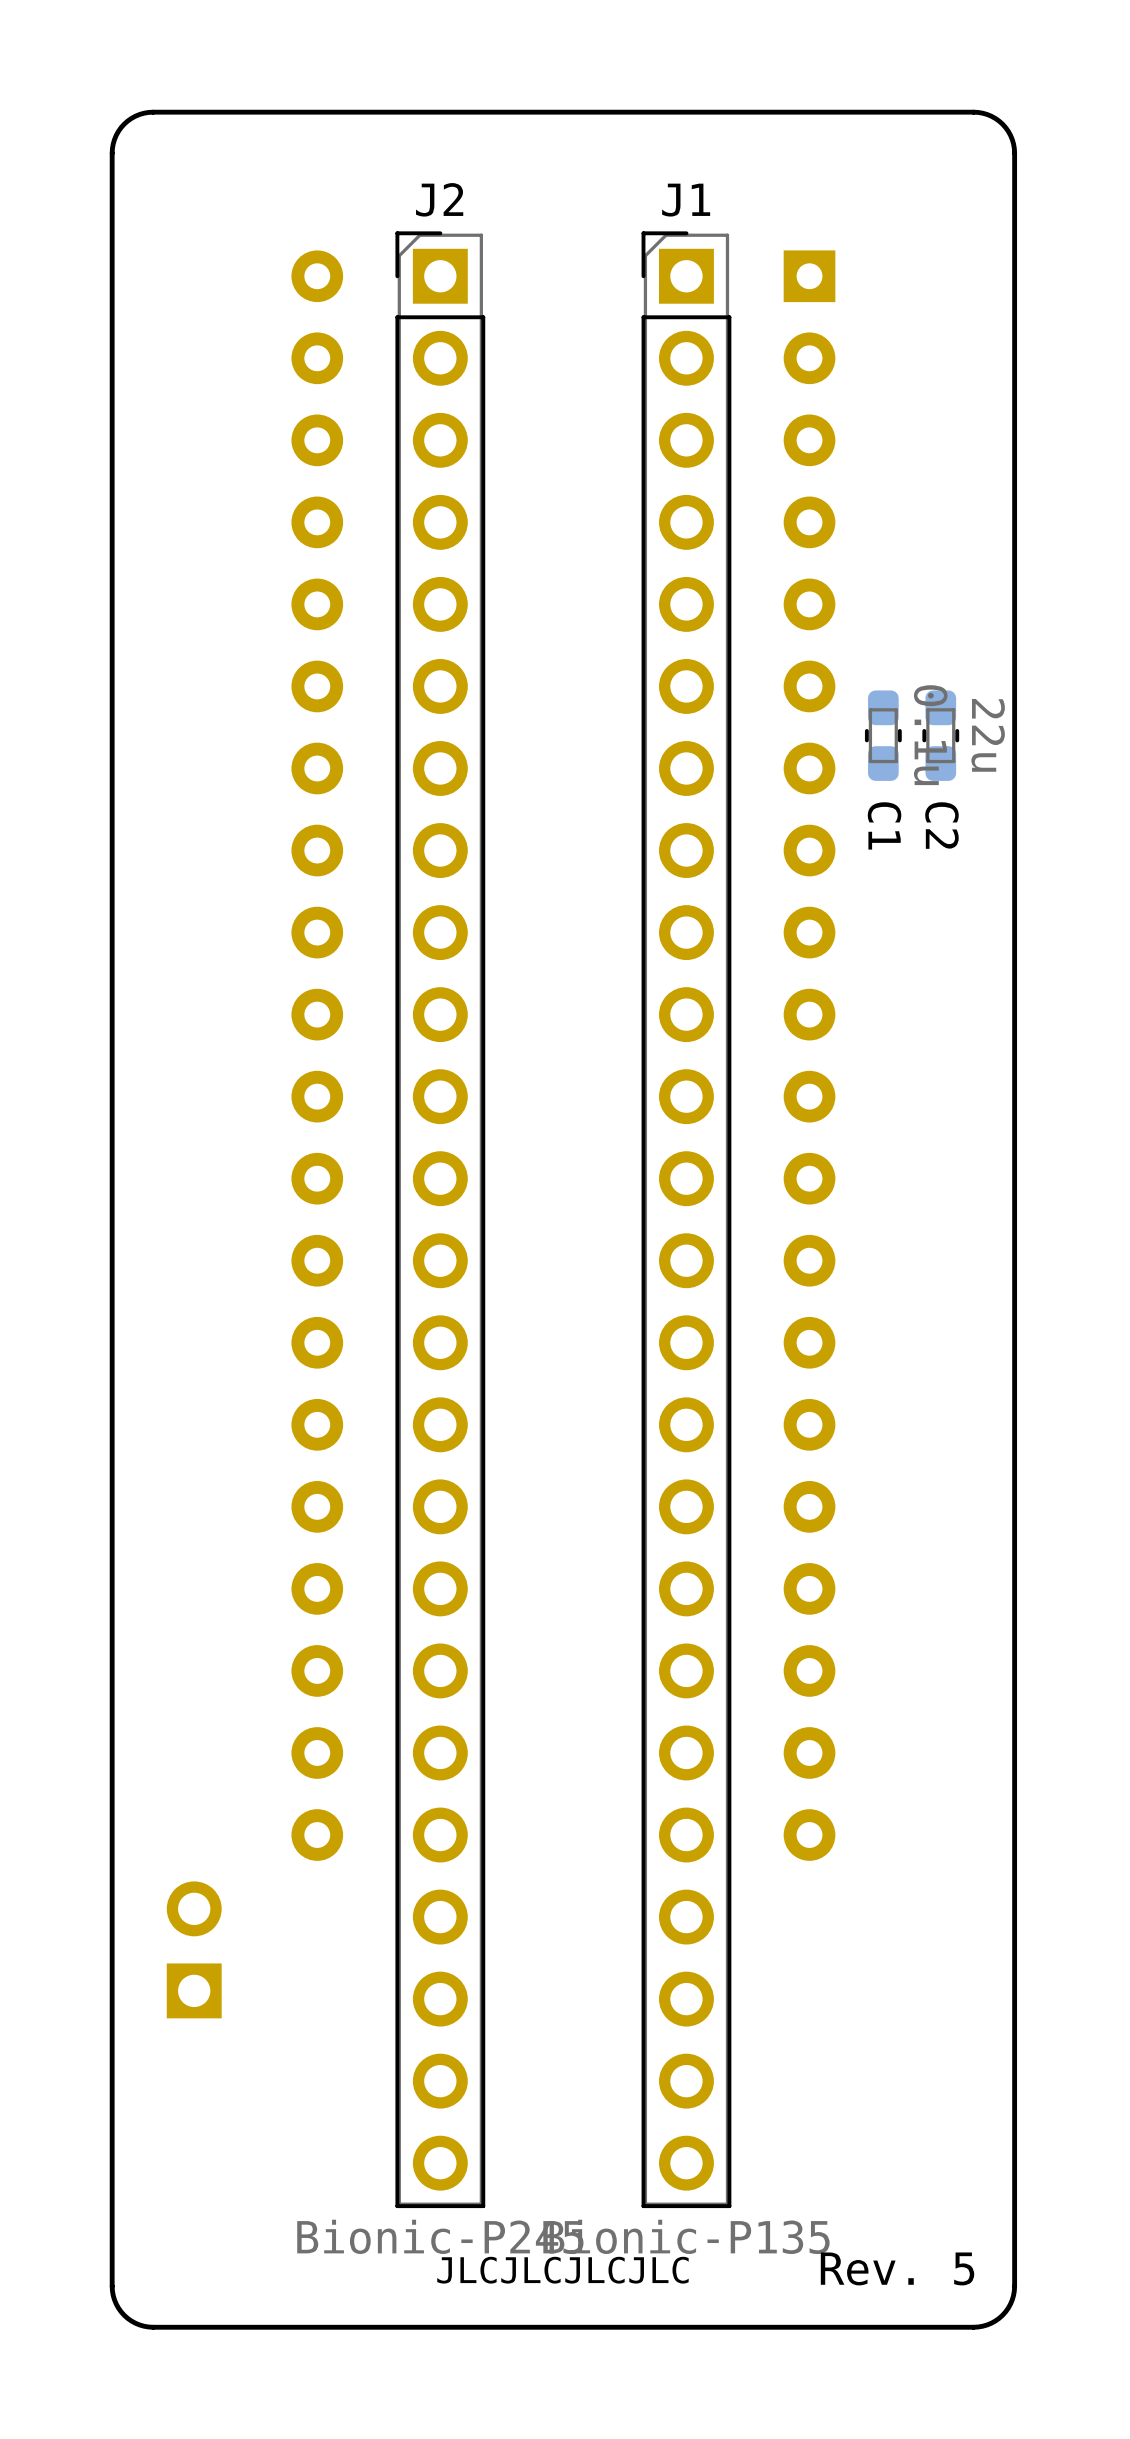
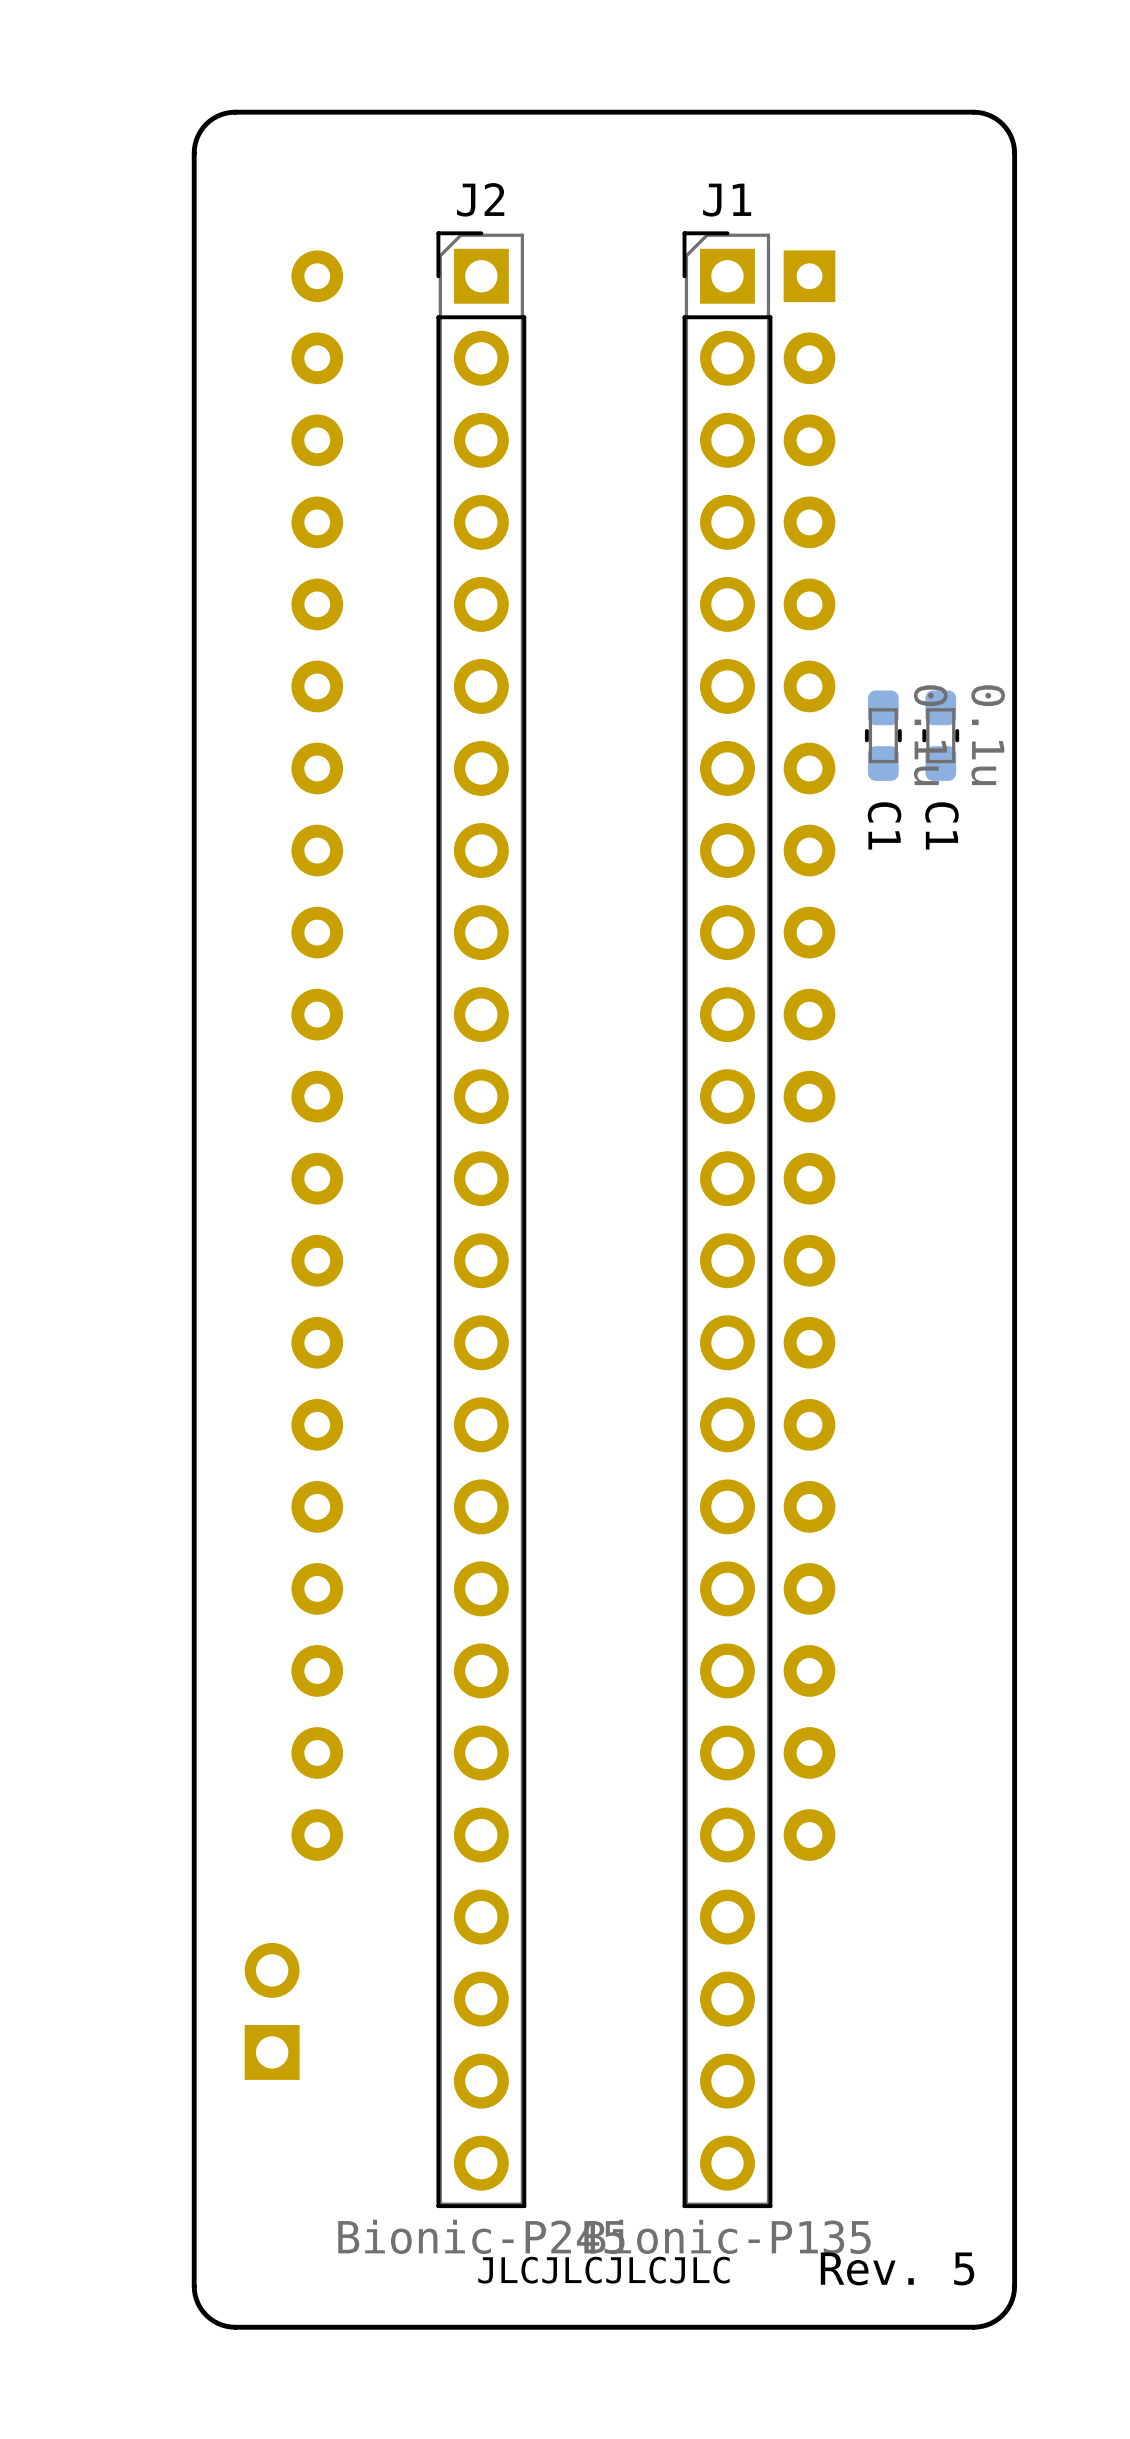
board edge: (235, 112) (153, 112) (139, 114) (127, 121) (118, 131) (113, 144) (112, 153) (112, 2290) (116, 2304) (121, 2311) (127, 2318) (139, 2324) (153, 2327) (235, 2327) -> (235, 112) (217, 116) (206, 124) (196, 139) (194, 153) (194, 2286) (198, 2304) (206, 2315) (221, 2324) (235, 2327)
C2 value: 22u (988, 735) -> 0.1u (988, 735)
C2 name: C2 (941, 825) -> C1 (941, 825)
J2 position: (440, 1219) -> (481, 1219)
J1 position: (686, 1219) -> (727, 1219)
part position: (194, 1949) -> (272, 2011)
text position: JLCJLCJLCJLC (562, 2270) -> JLCJLCJLCJLC (603, 2270)

